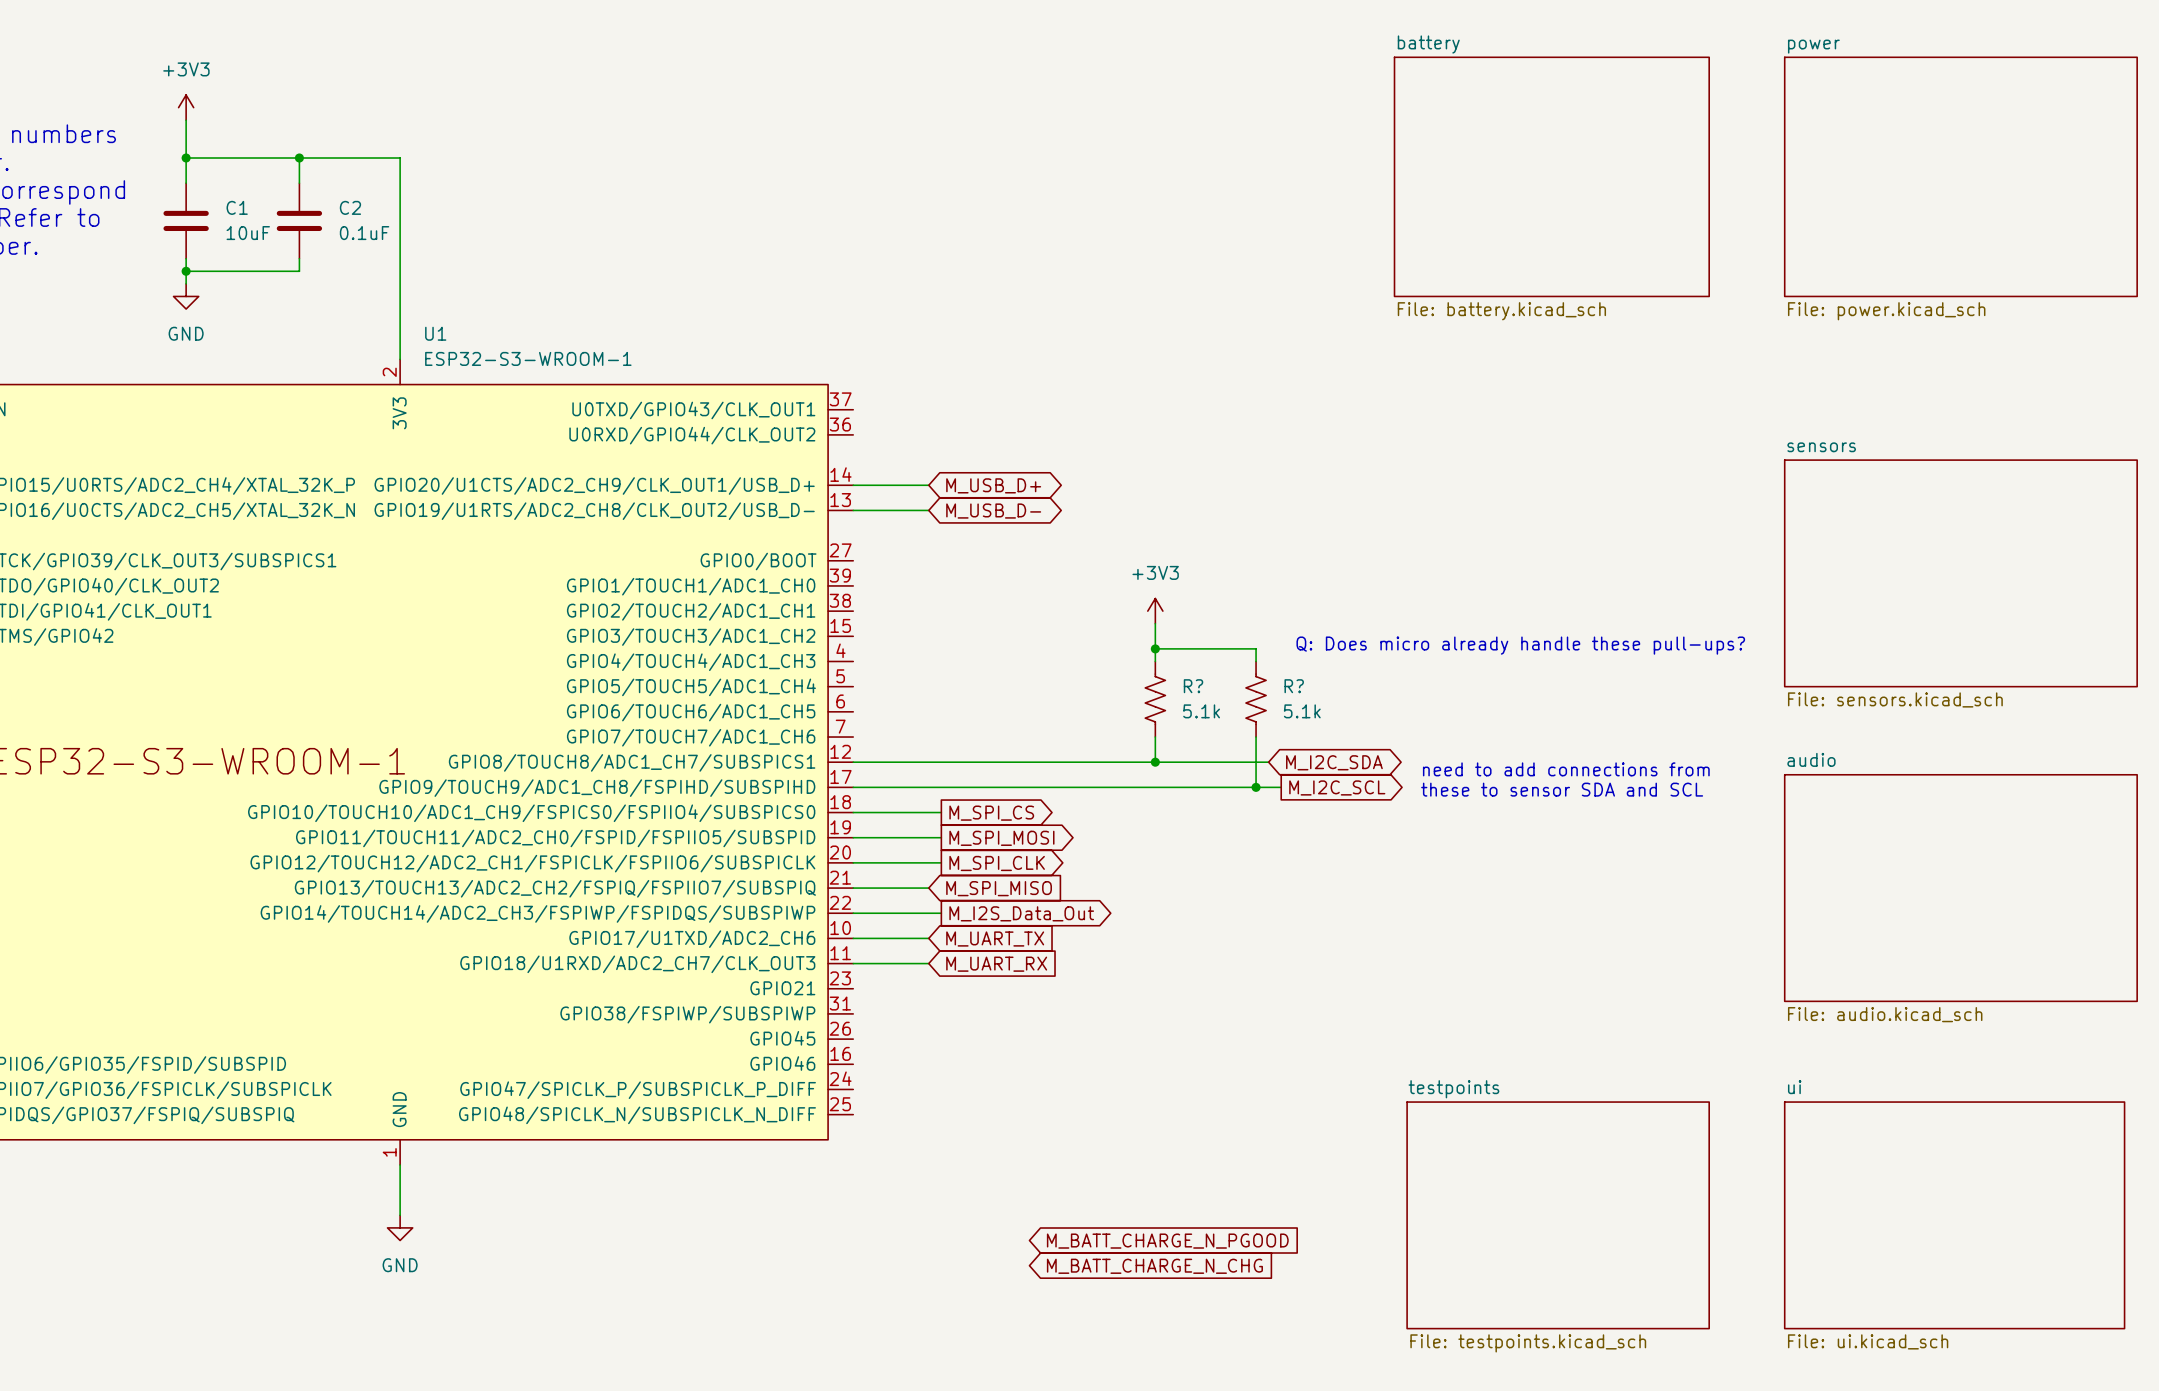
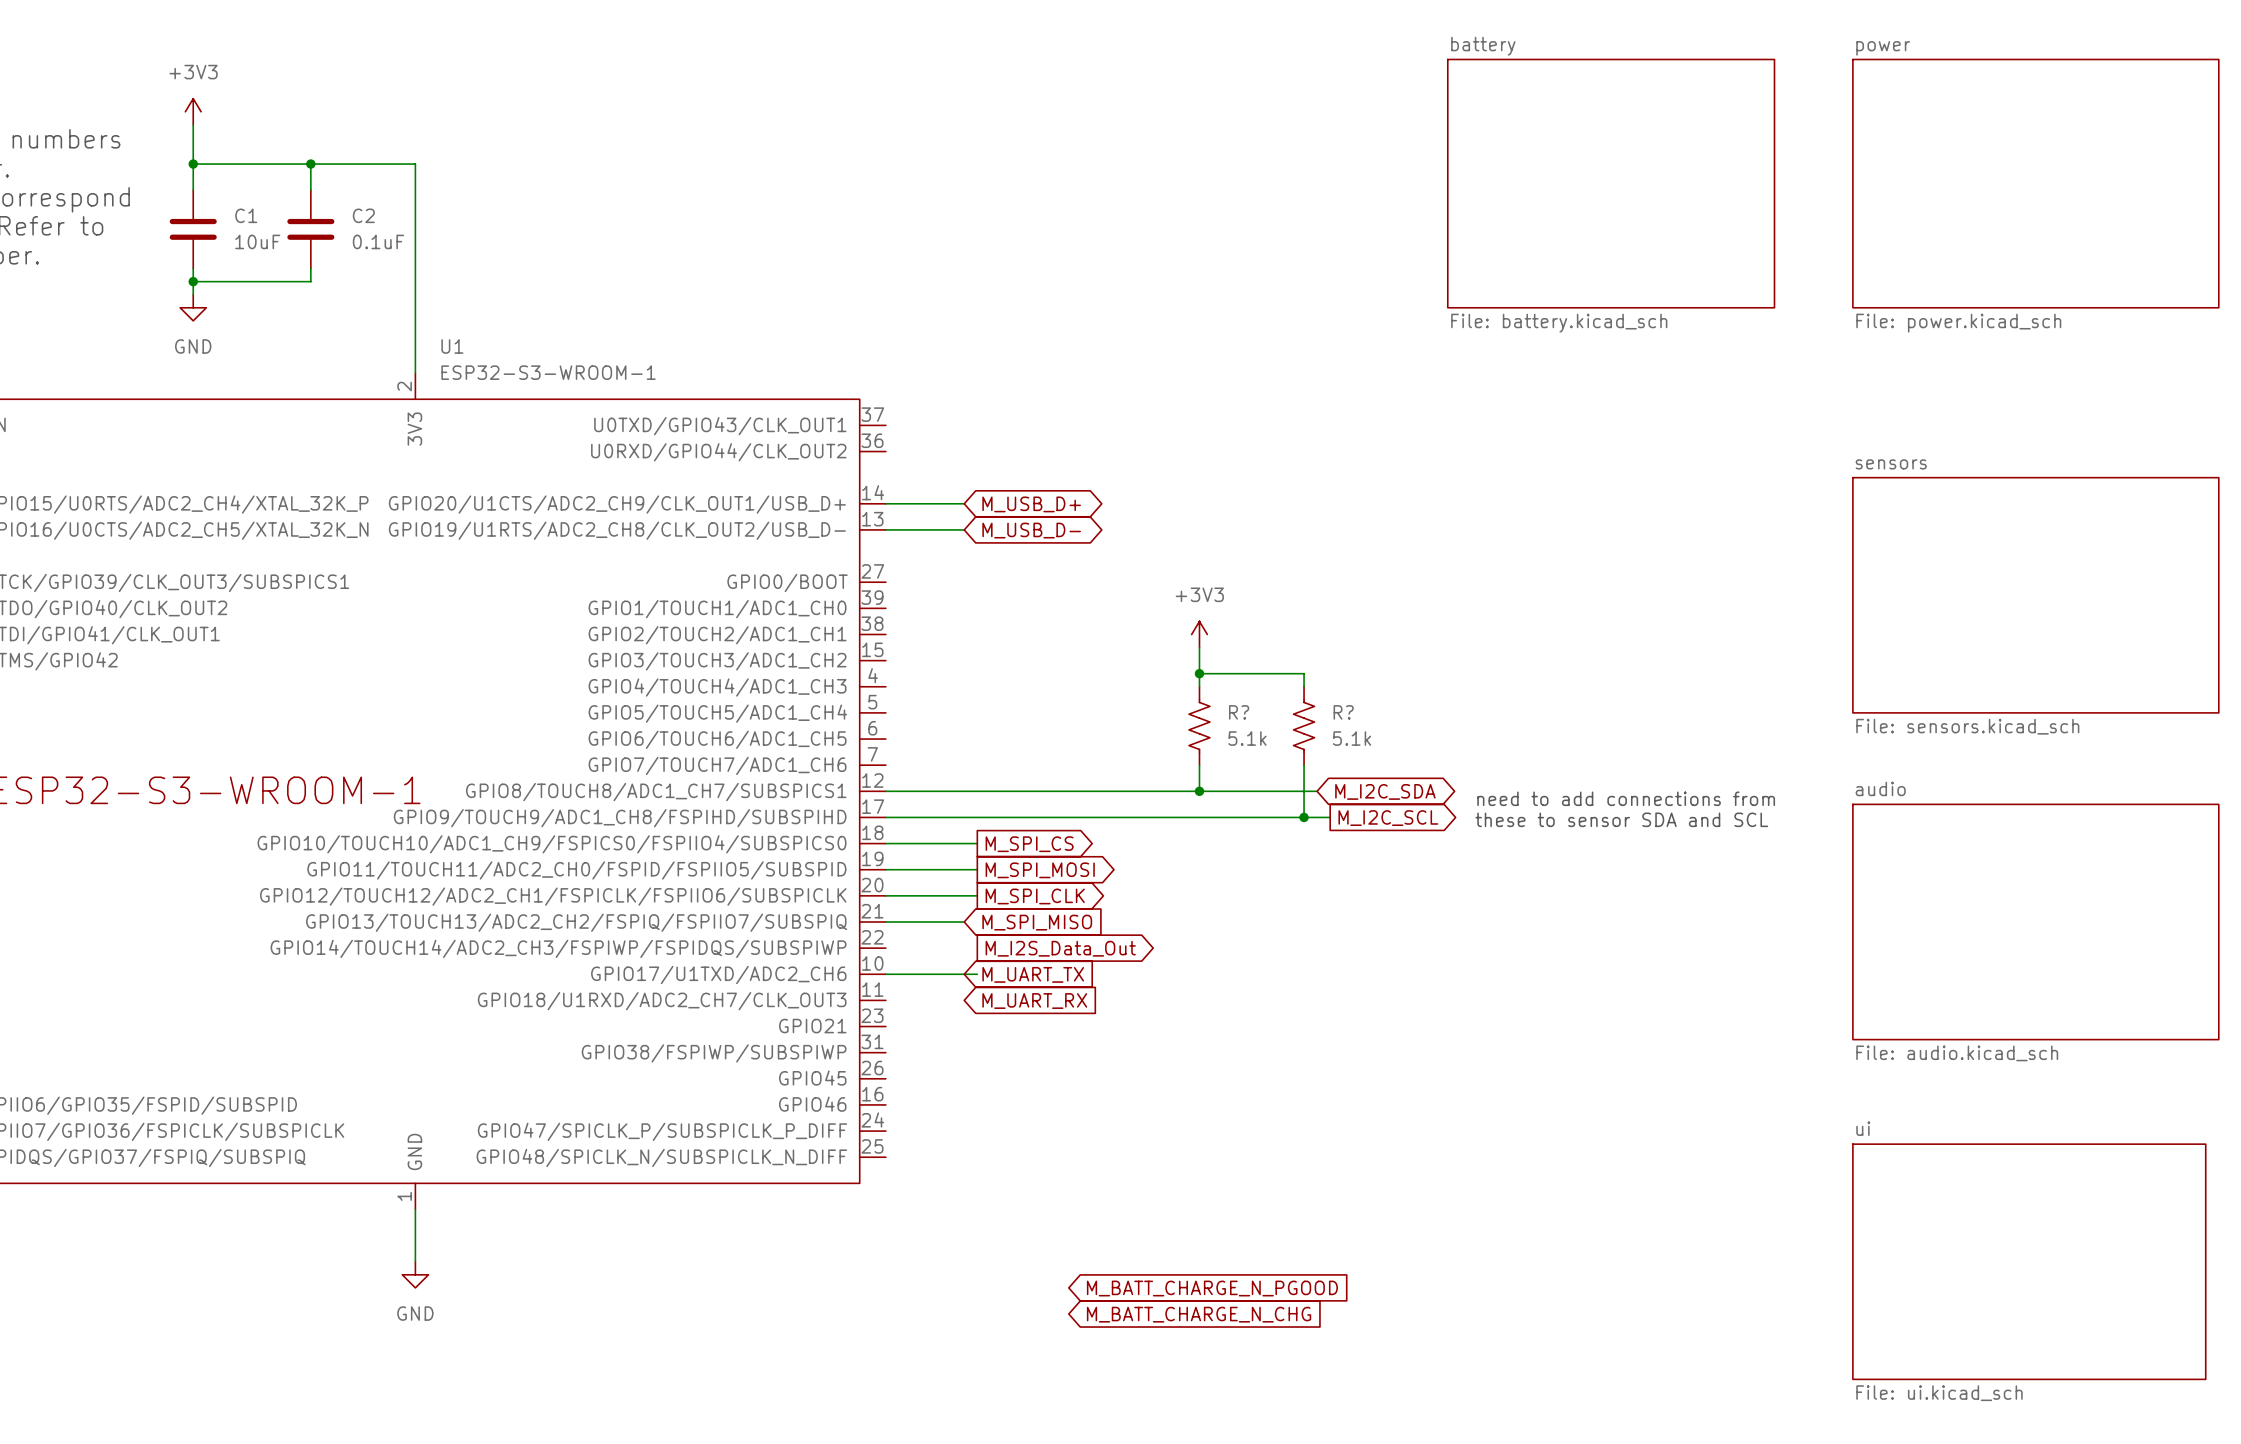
text: Q: Does micro already handle these pull-ups? (1520, 645) -> none
wire: (853, 913) (941, 913) -> none
wire: none -> (964, 974) (977, 974)
wire: (853, 963) (928, 963) -> none
sheet testpoints: File: testpoints.kicad_sch (1558, 1215) -> none

